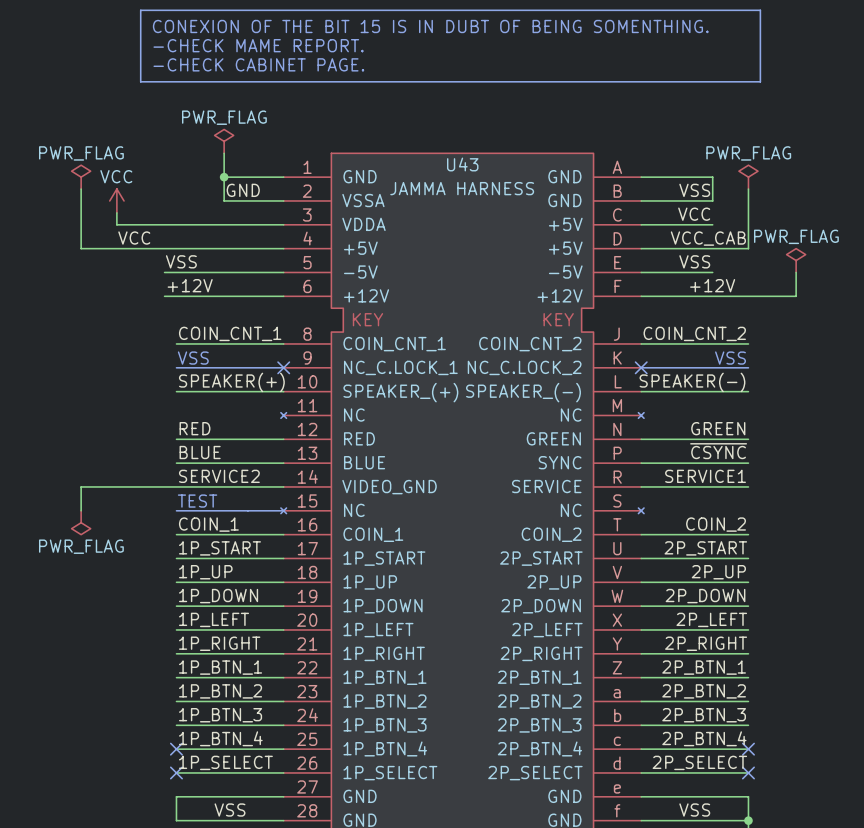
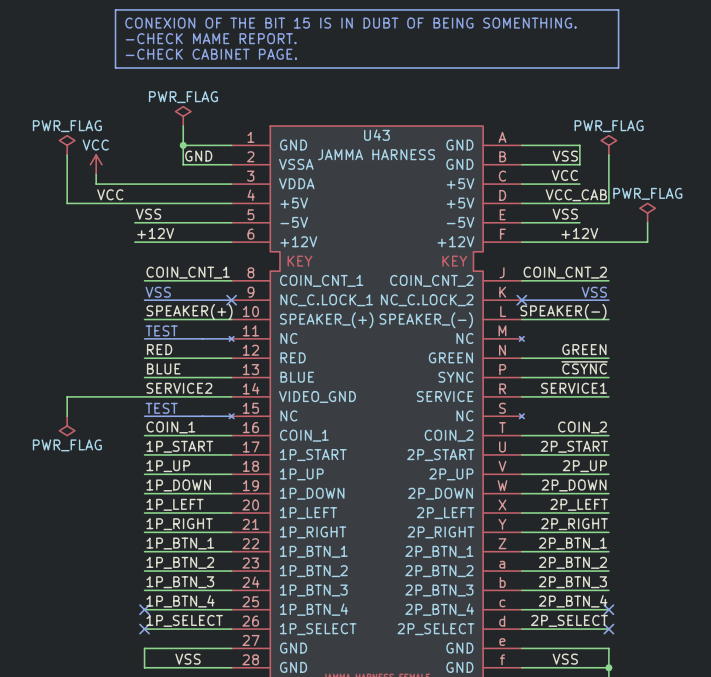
text: none -> TEST (161, 330)
line: none -> (144, 338) (231, 338)

